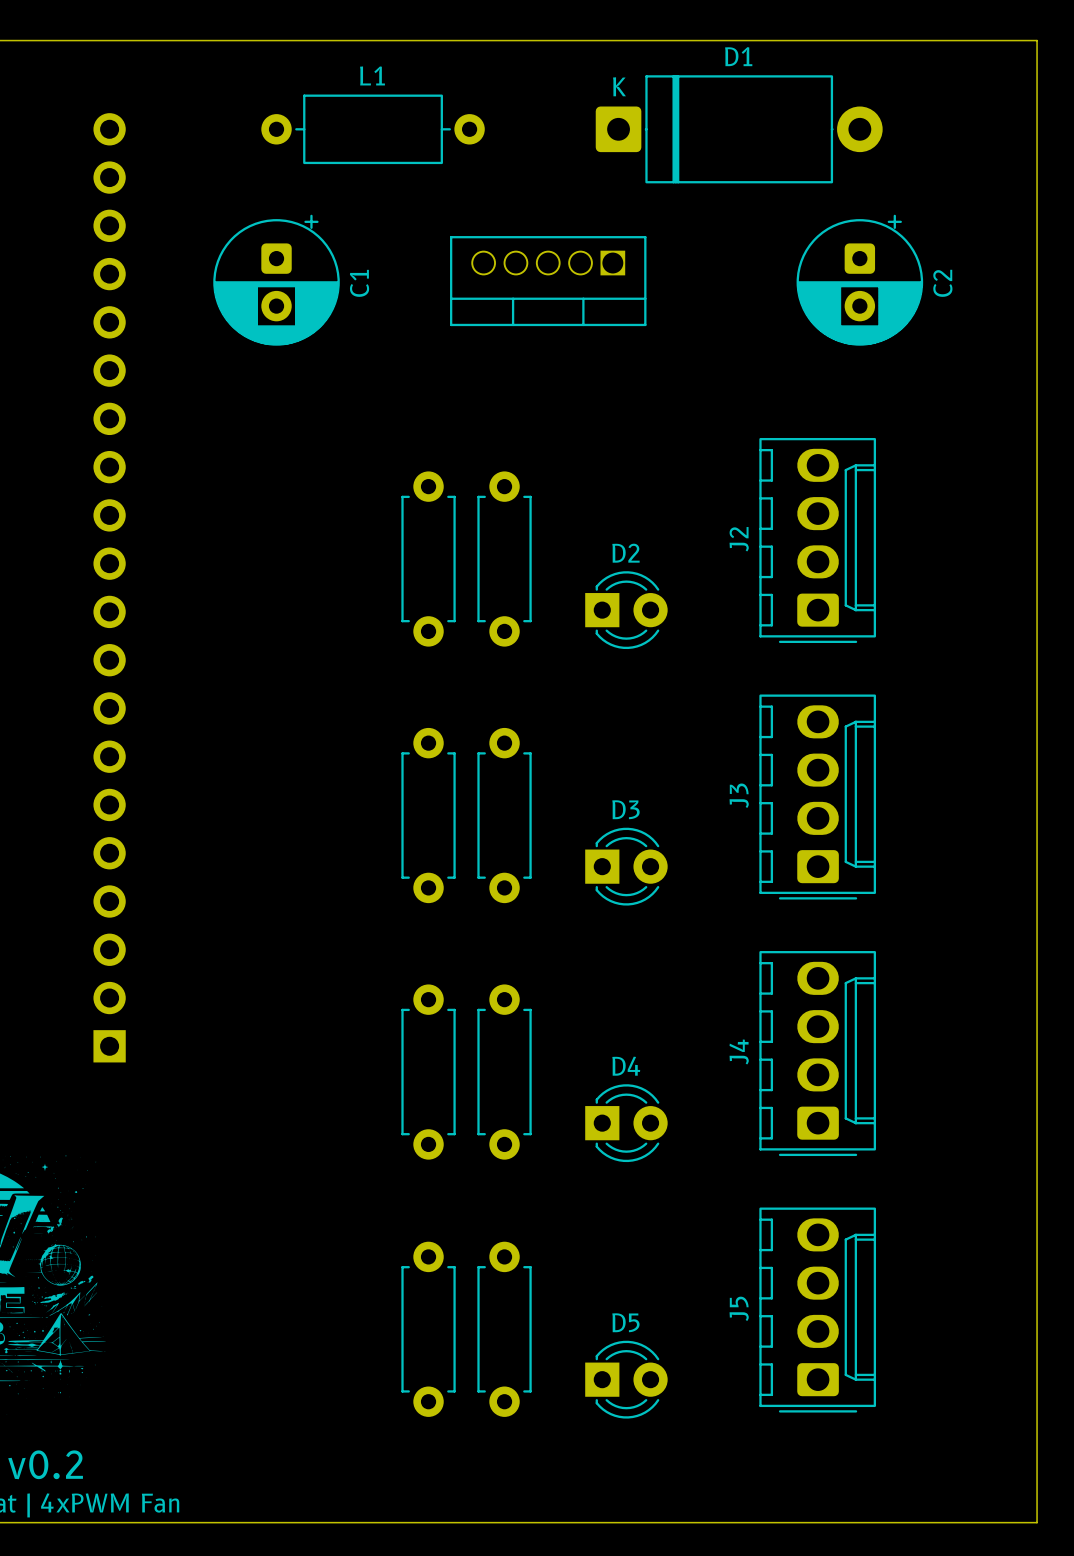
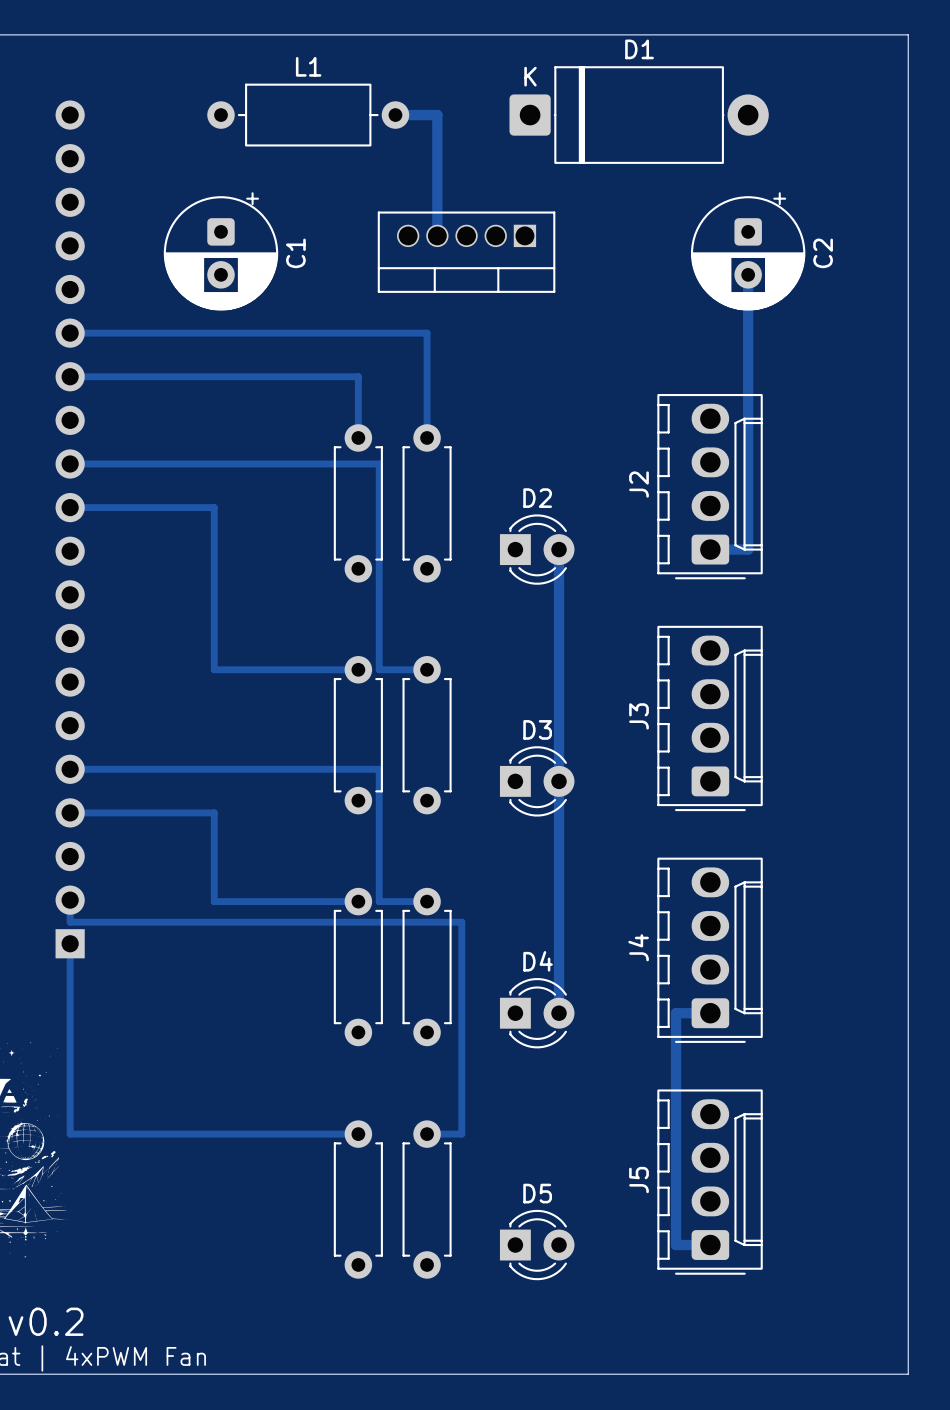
track: none -> (395, 115) (437, 115) (437, 235)
track: none -> (748, 274) (748, 549) (710, 549)
track: none -> (70, 333) (427, 333) (427, 437)
track: none -> (70, 376) (358, 376) (358, 437)
track: none -> (70, 463) (379, 463) (379, 669) (427, 669)
track: none -> (70, 507) (214, 507) (214, 669) (358, 669)
track: none -> (559, 549) (559, 1013)
track: none -> (70, 769) (379, 769) (379, 901) (427, 901)
track: none -> (70, 812) (214, 812) (214, 901) (358, 901)
track: none -> (70, 900) (70, 922) (461, 922) (461, 1134) (427, 1134)
track: none -> (70, 943) (70, 1134) (358, 1134)
track: none -> (710, 1013) (676, 1013) (676, 1245) (710, 1245)

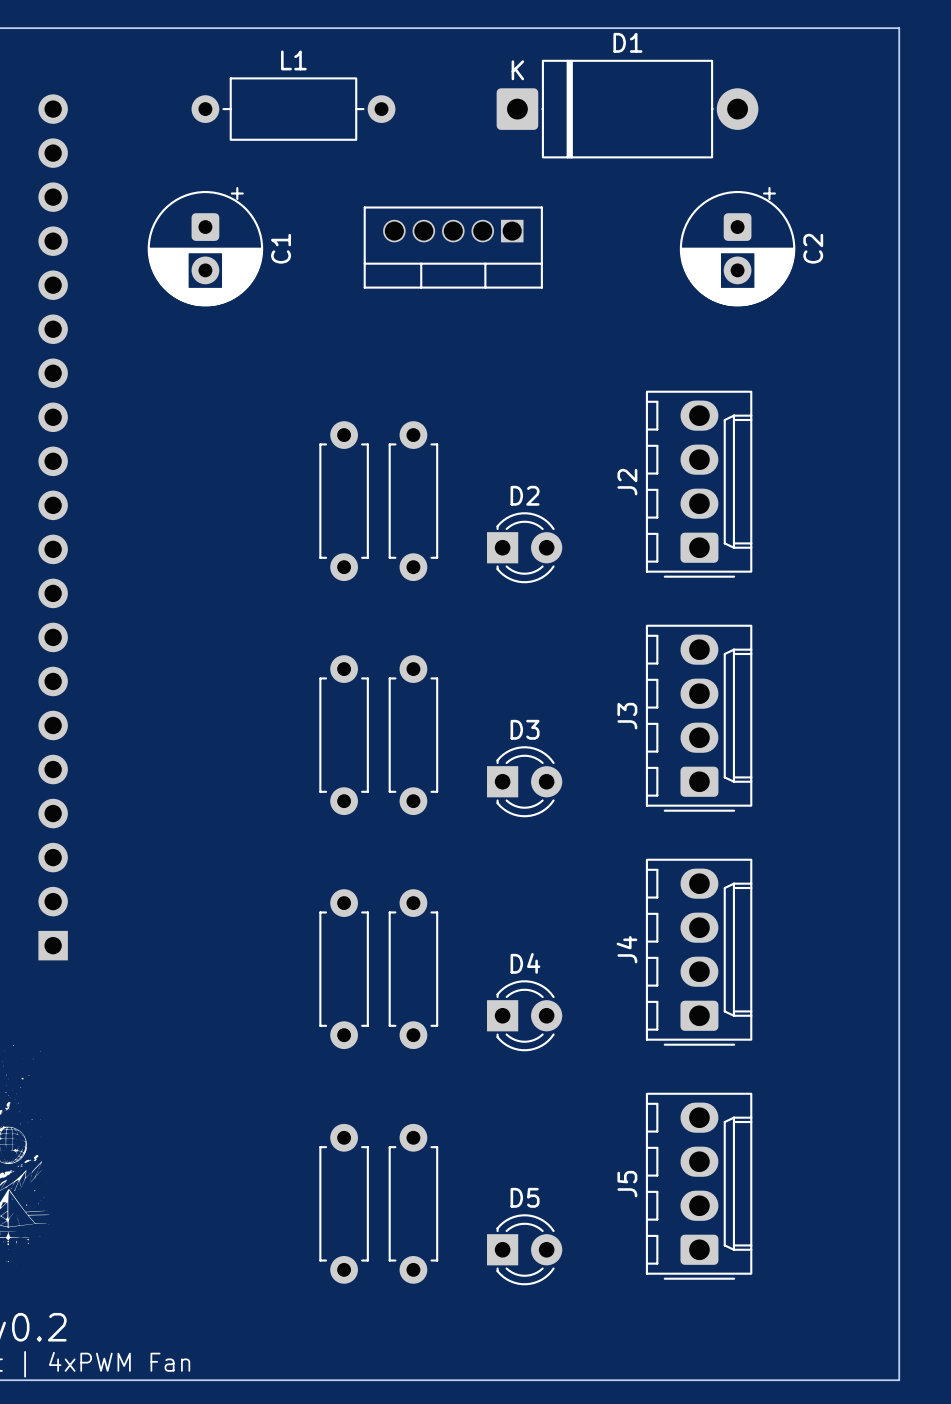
track: (395, 115) (437, 115) (437, 235) -> none
track: (748, 274) (748, 549) (710, 549) -> none
track: (70, 333) (427, 333) (427, 437) -> none
track: (70, 376) (358, 376) (358, 437) -> none
track: (70, 463) (379, 463) (379, 669) (427, 669) -> none
track: (70, 507) (214, 507) (214, 669) (358, 669) -> none
track: (559, 549) (559, 1013) -> none
track: (70, 769) (379, 769) (379, 901) (427, 901) -> none
track: (70, 812) (214, 812) (214, 901) (358, 901) -> none
track: (70, 900) (70, 922) (461, 922) (461, 1134) (427, 1134) -> none
track: (70, 943) (70, 1134) (358, 1134) -> none
track: (710, 1013) (676, 1013) (676, 1245) (710, 1245) -> none

